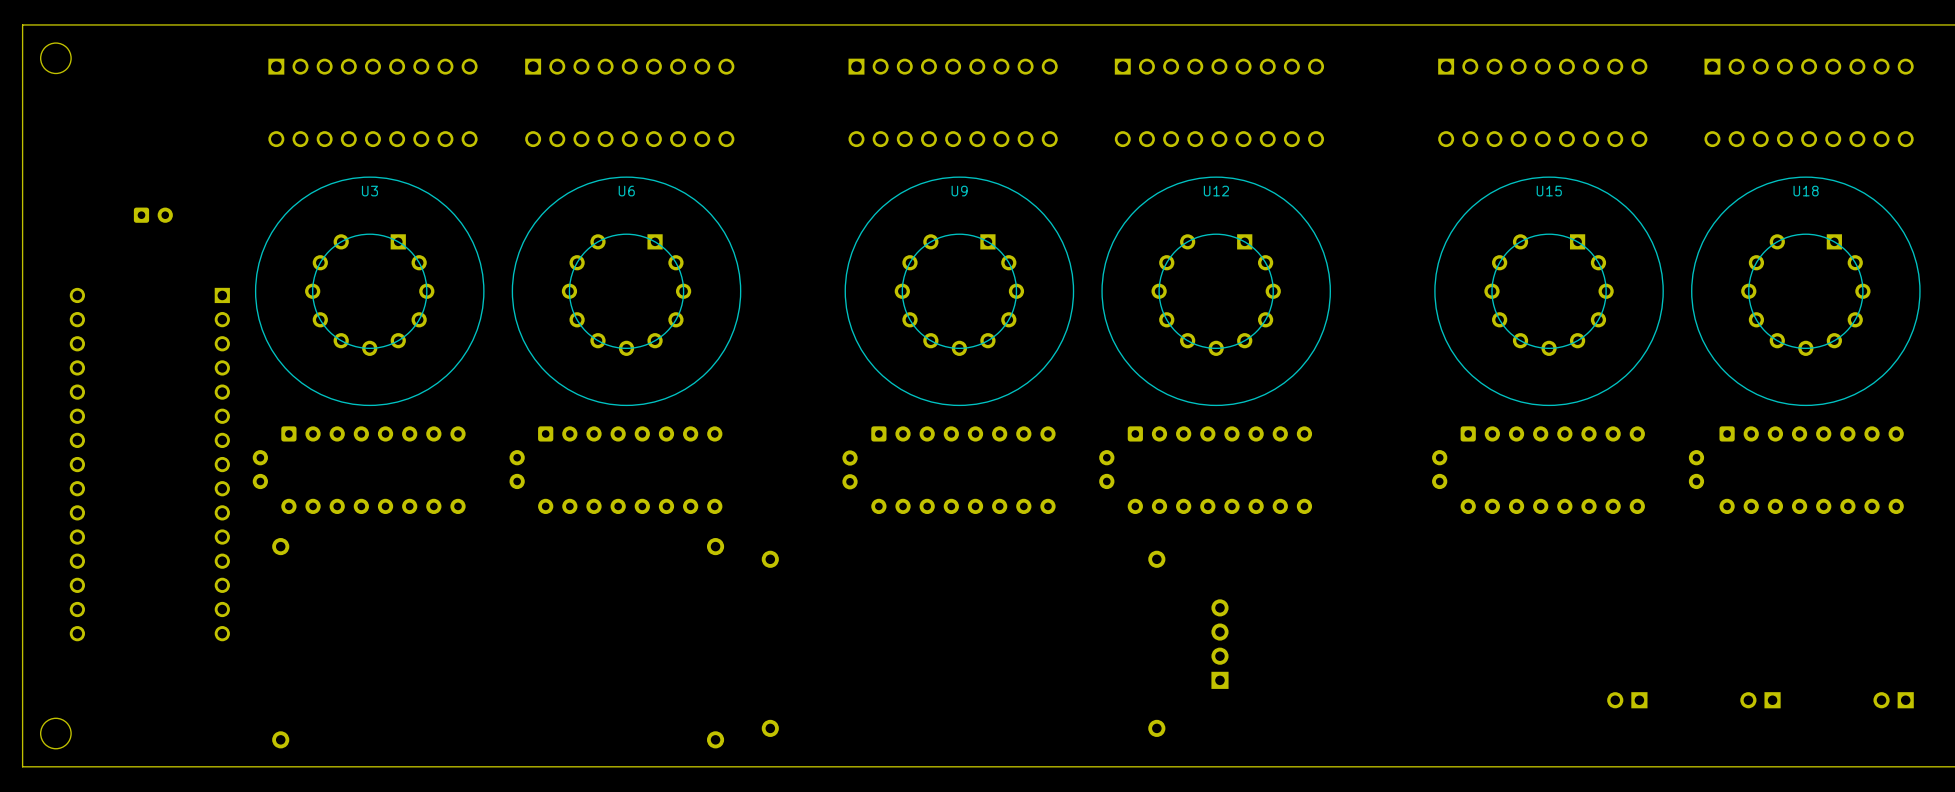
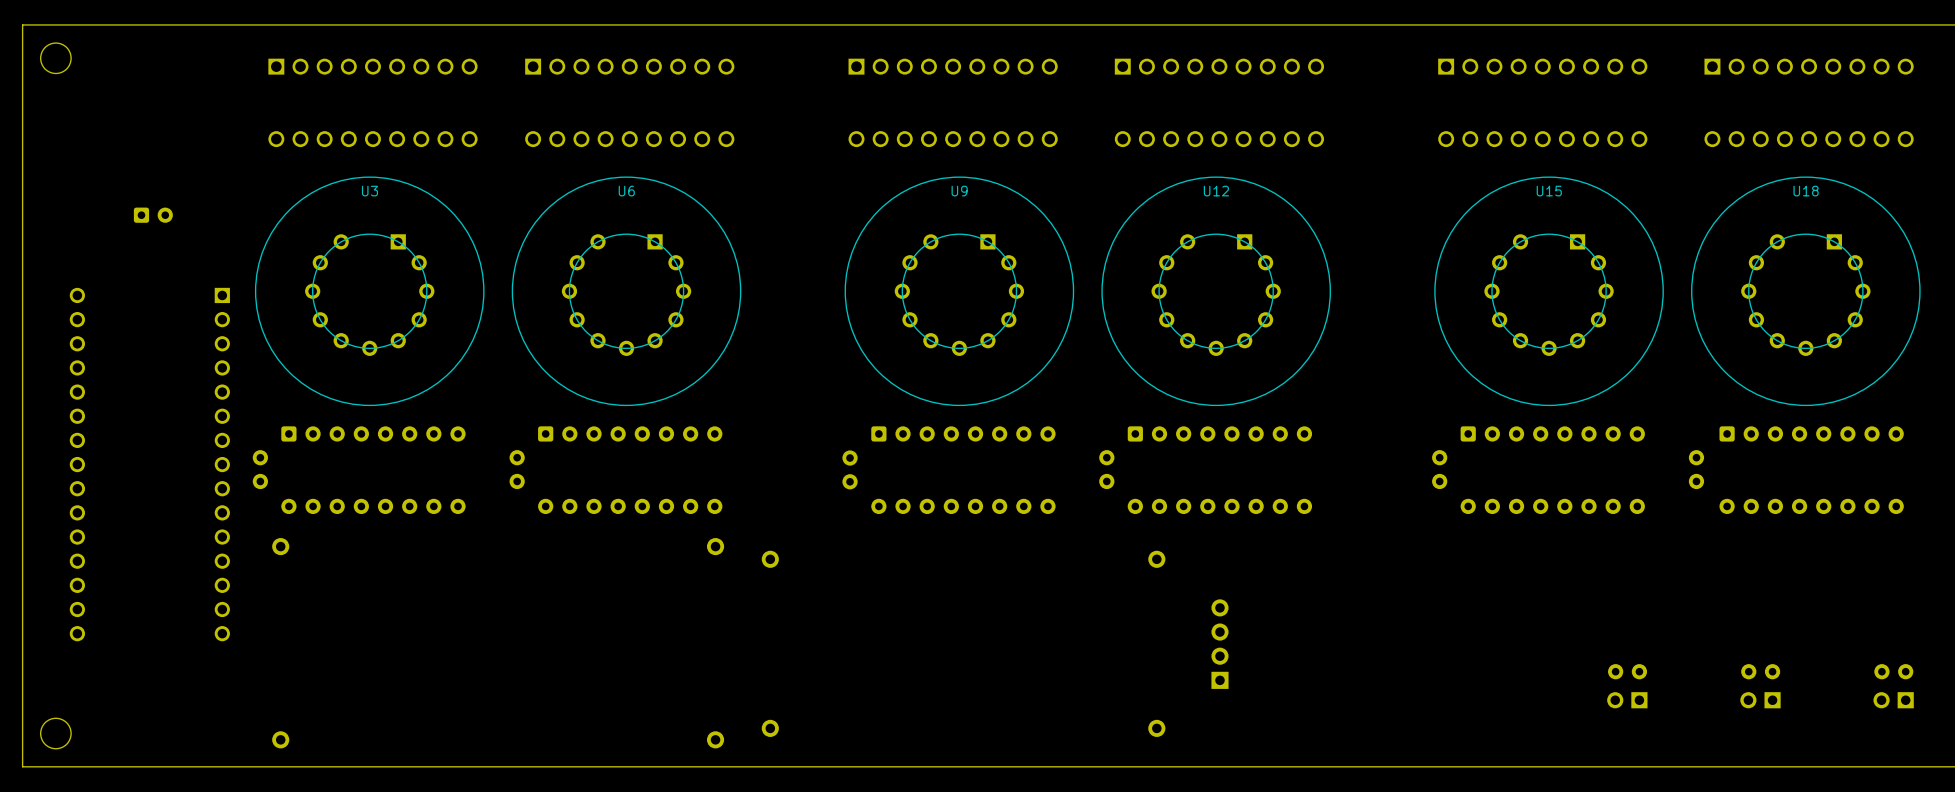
part: none -> (1627, 671)
part: none -> (1760, 671)
part: none -> (1893, 671)

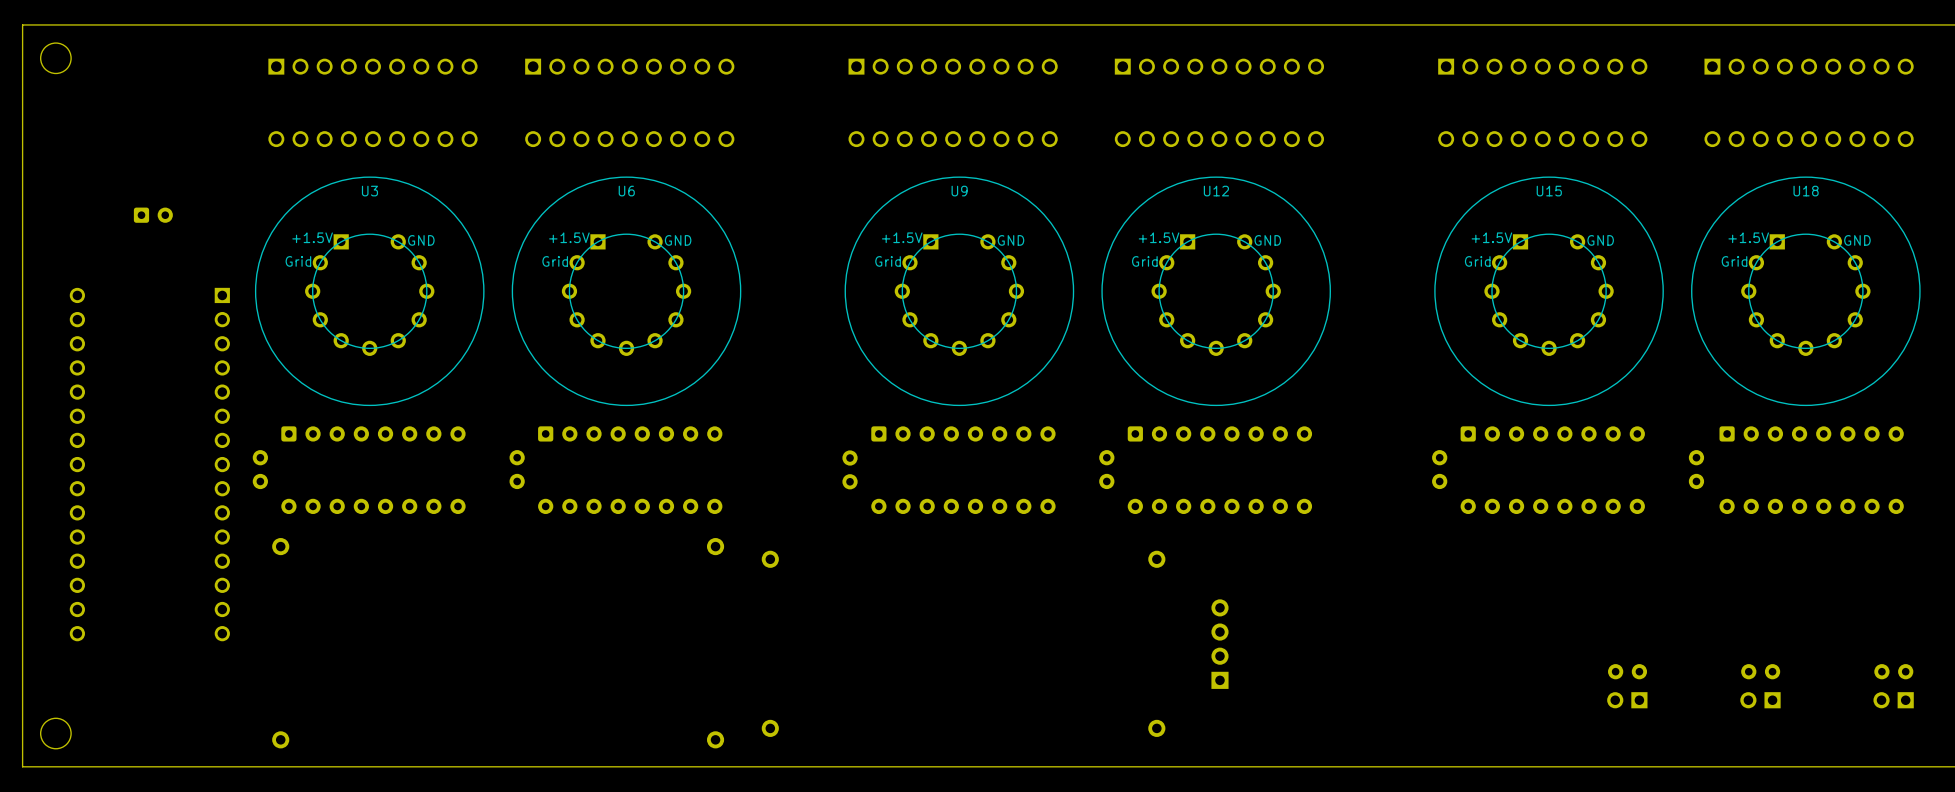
U3 footprint: [255, 176, 485, 406] -> [255, 176, 485, 406]
U6 footprint: [511, 176, 742, 406] -> [511, 176, 742, 406]
U9 footprint: [844, 176, 1075, 406] -> [844, 176, 1075, 406]
U12 footprint: [1101, 176, 1331, 406] -> [1101, 176, 1331, 406]
U15 footprint: [1434, 176, 1664, 406] -> [1434, 176, 1664, 406]
U18 footprint: [1691, 176, 1921, 406] -> [1691, 176, 1921, 406]

